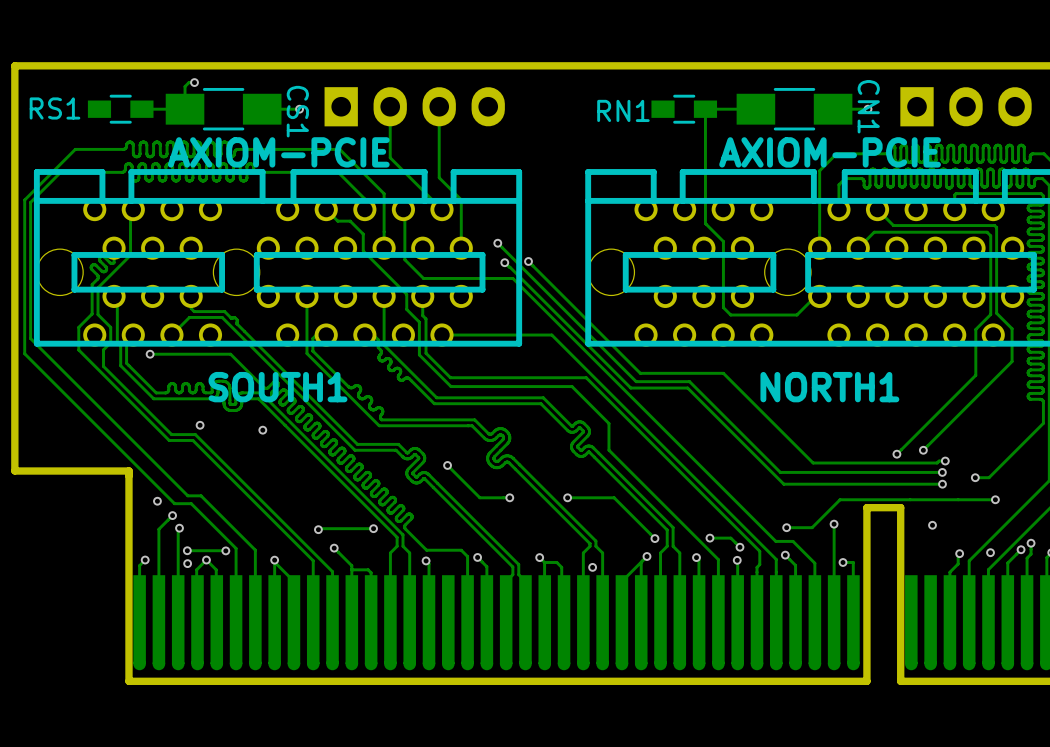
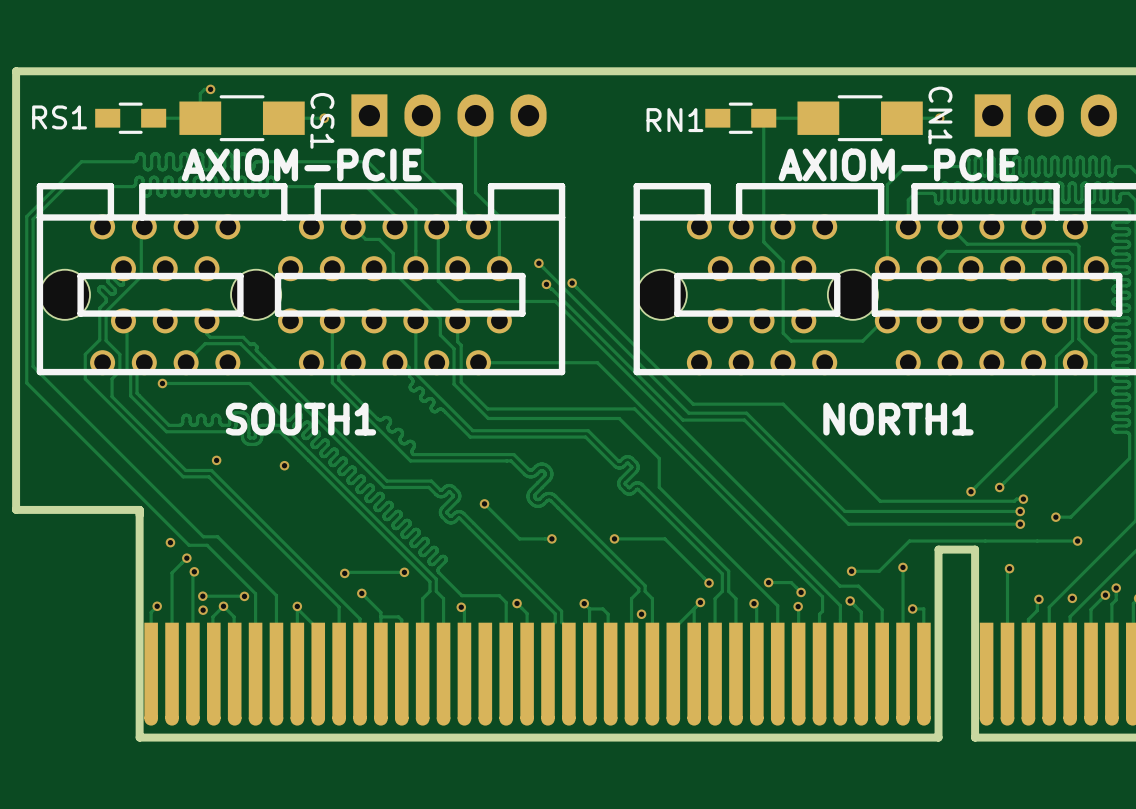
track: none -> (1009, 568) (1007, 570) (1007, 670)

